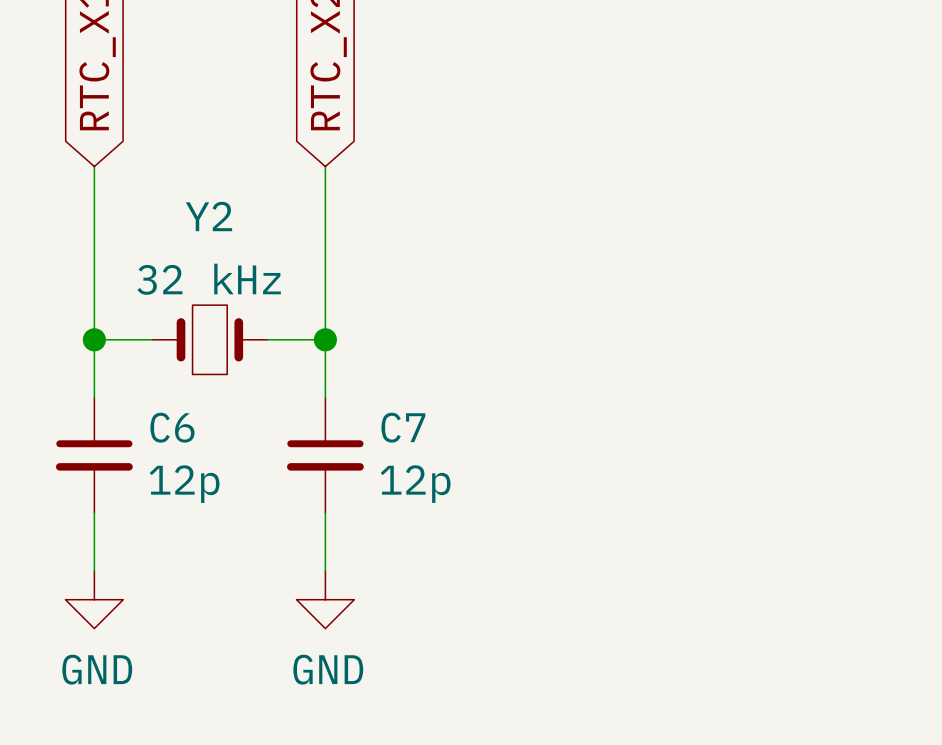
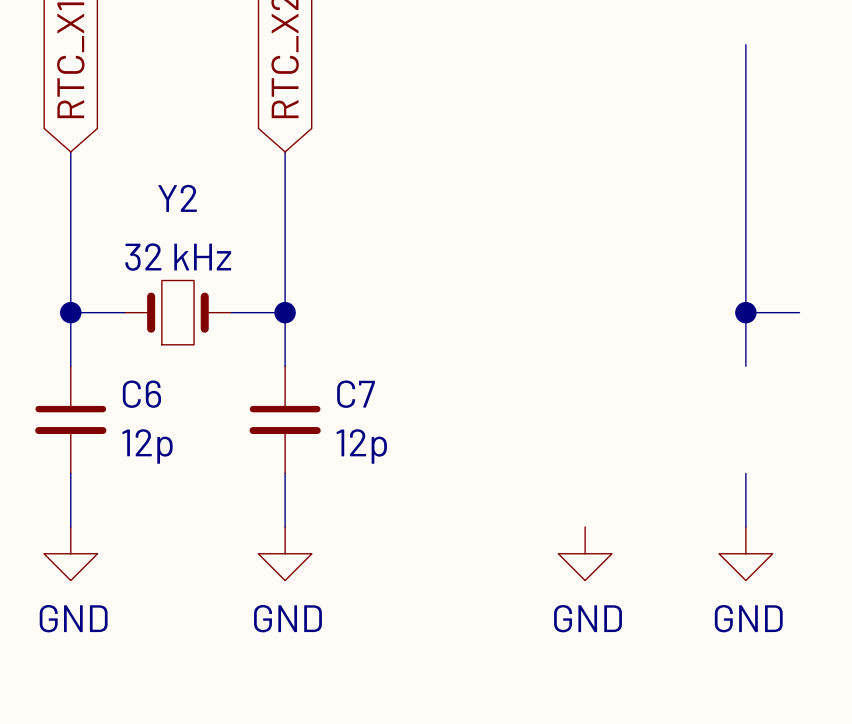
wire: none -> (745, 44) (745, 366)
wire: none -> (745, 312) (799, 312)
junction: none -> (745, 312)
wire: none -> (745, 473) (745, 526)
power symbol: none -> GND (585, 553)
power symbol: none -> GND (745, 553)

